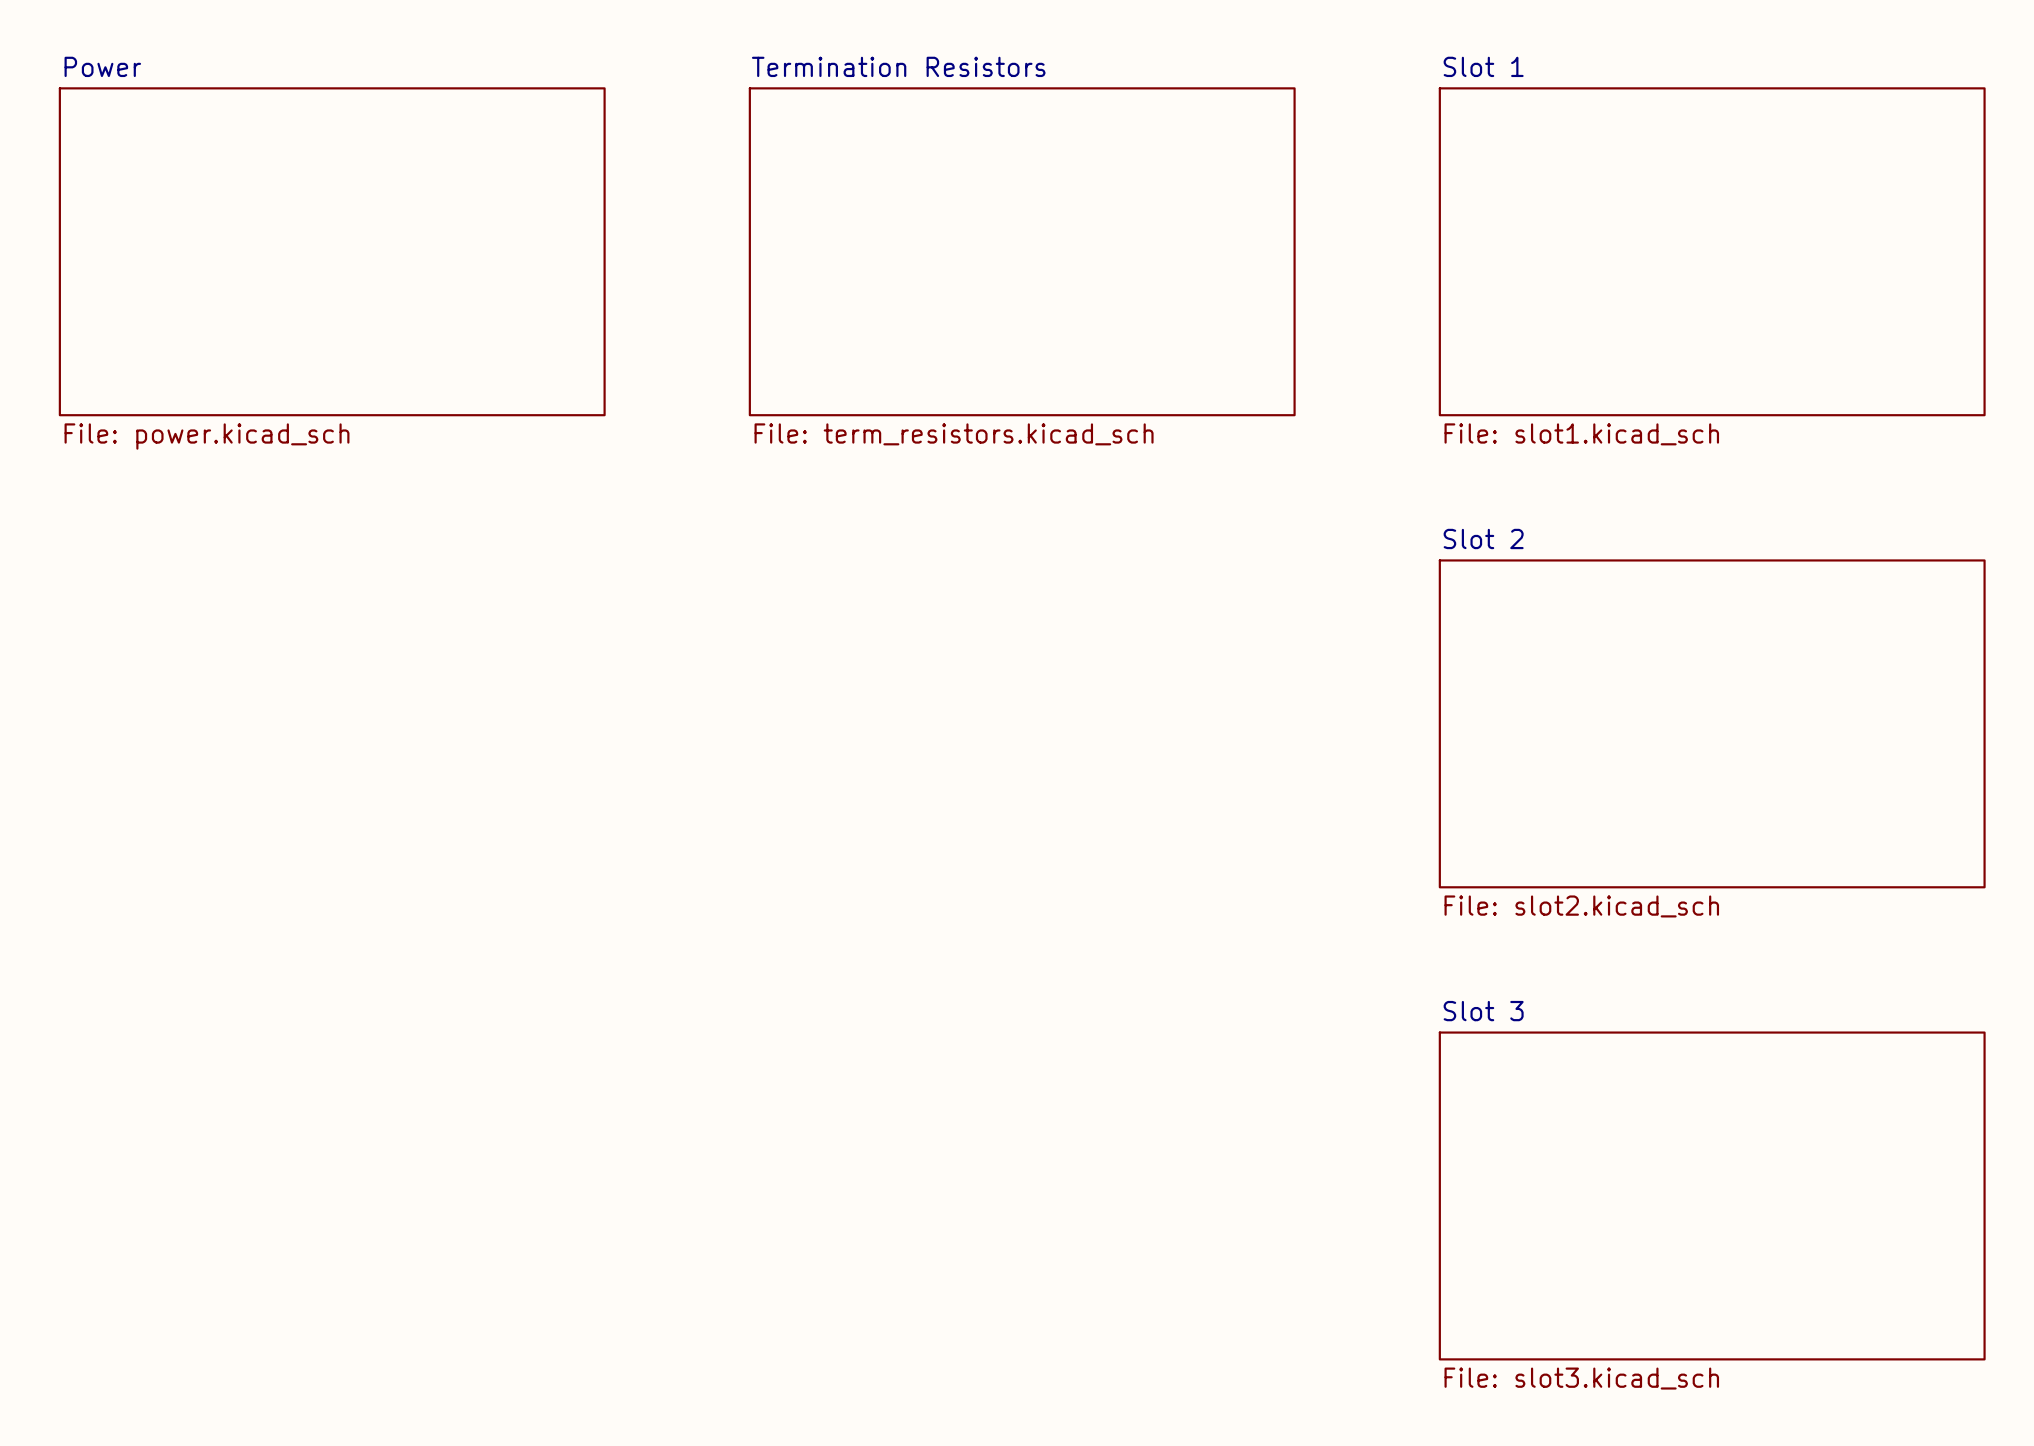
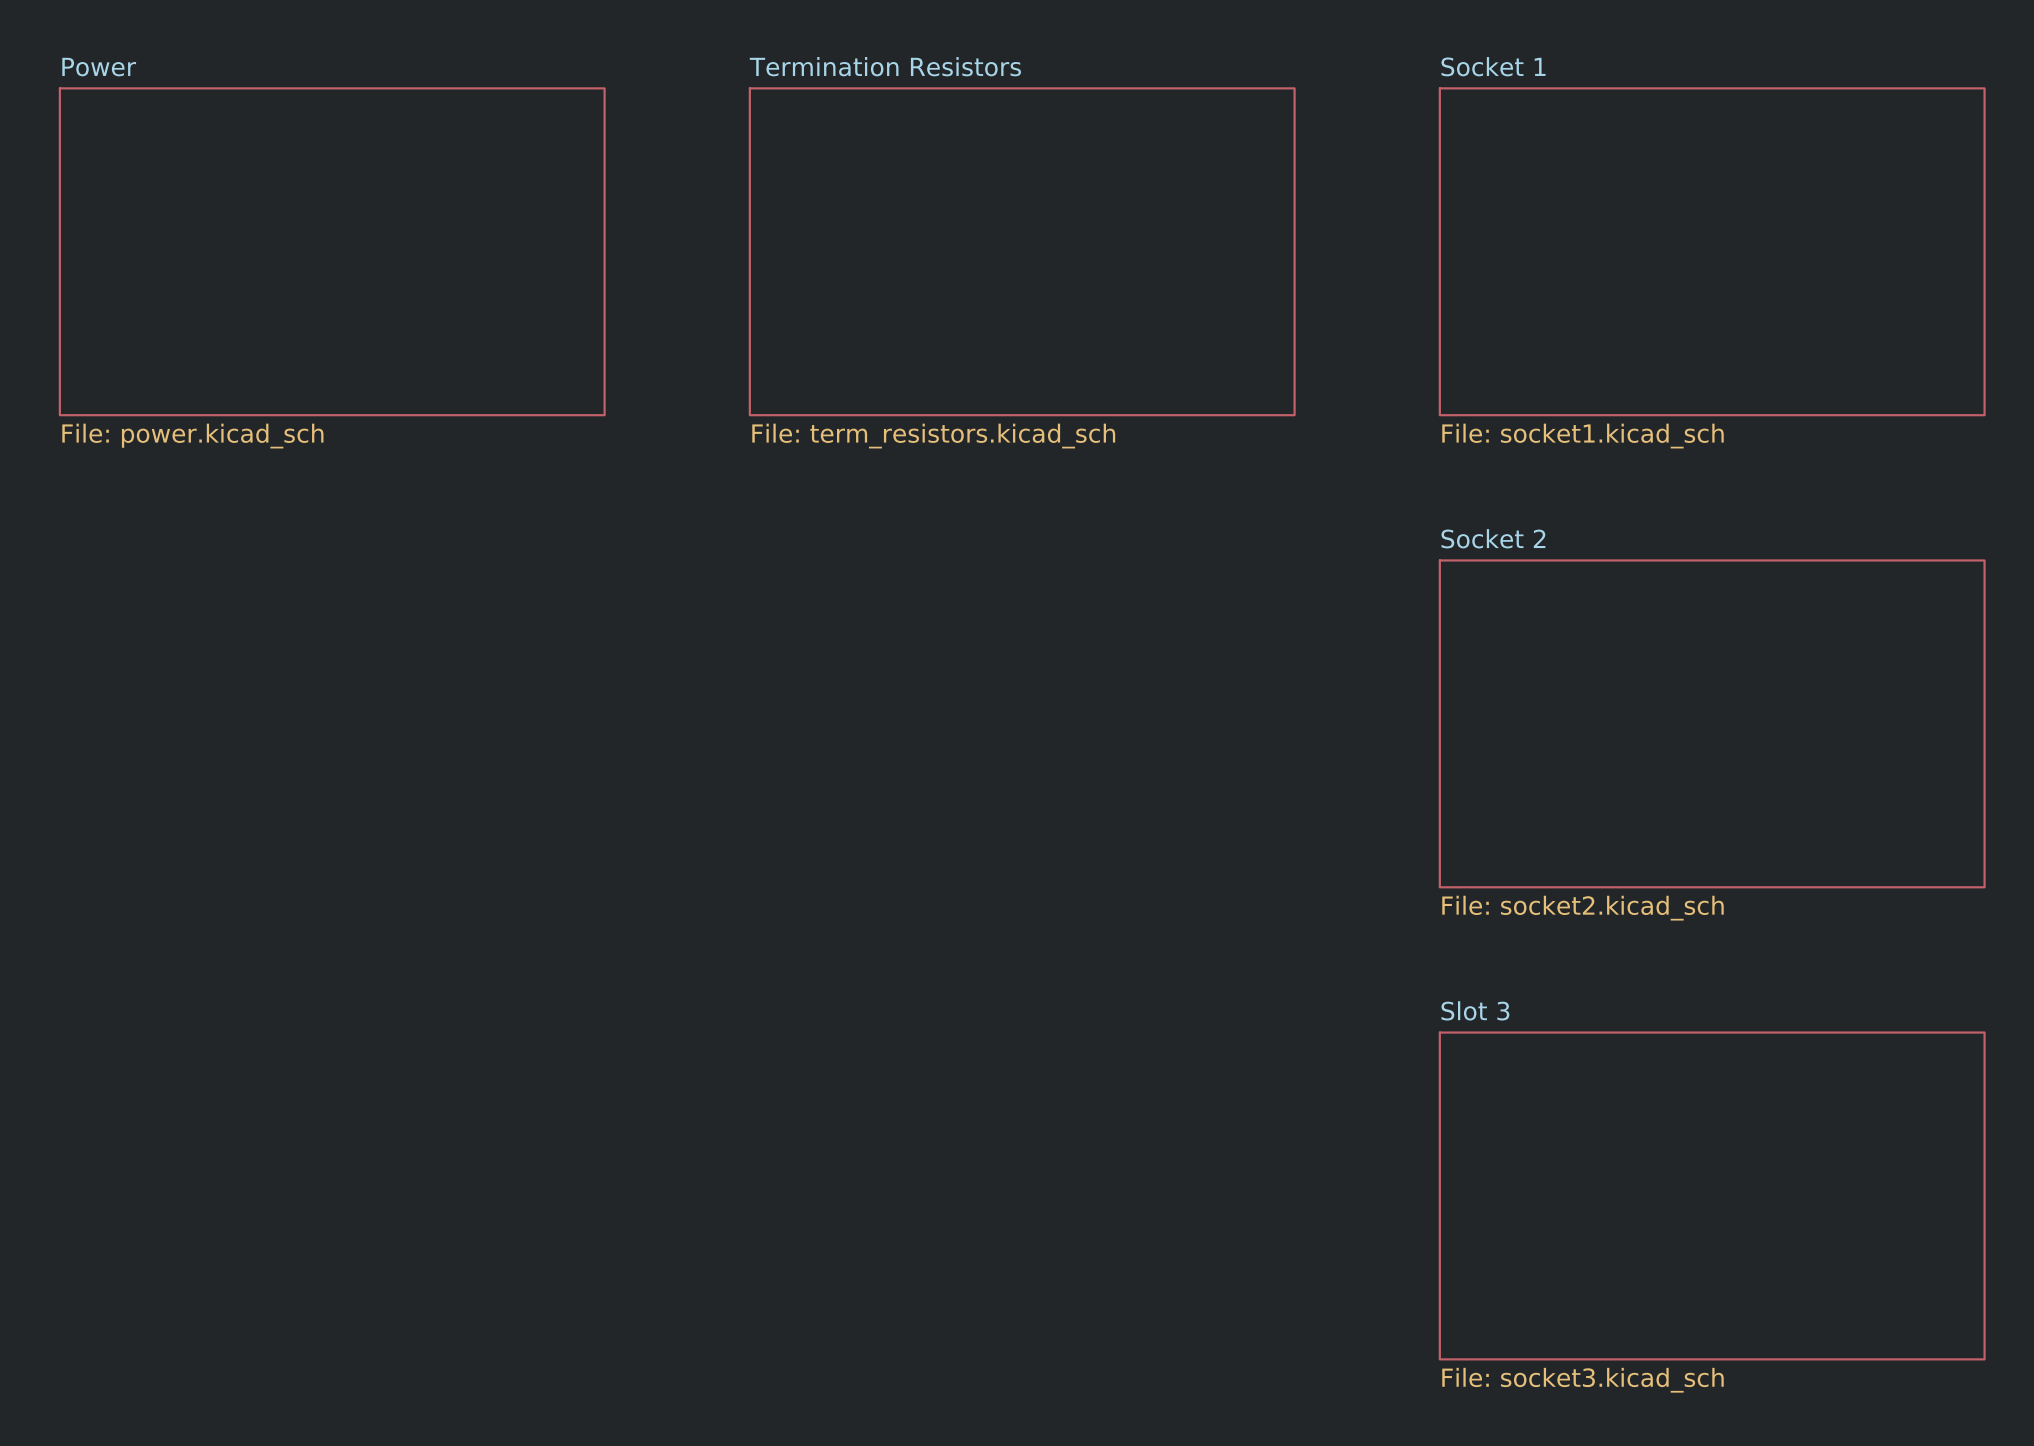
sheet Slot 1 name: Slot 1 (1483, 66) -> Socket 1 (1493, 66)
sheet Slot 1 value: File: slot1.kicad_sch (1581, 434) -> File: socket1.kicad_sch (1583, 436)
sheet Slot 2 name: Slot 2 (1483, 538) -> Socket 2 (1493, 538)
sheet Slot 2 value: File: slot2.kicad_sch (1581, 906) -> File: socket2.kicad_sch (1583, 908)
sheet Slot 3 value: File: slot3.kicad_sch (1581, 1378) -> File: socket3.kicad_sch (1583, 1380)

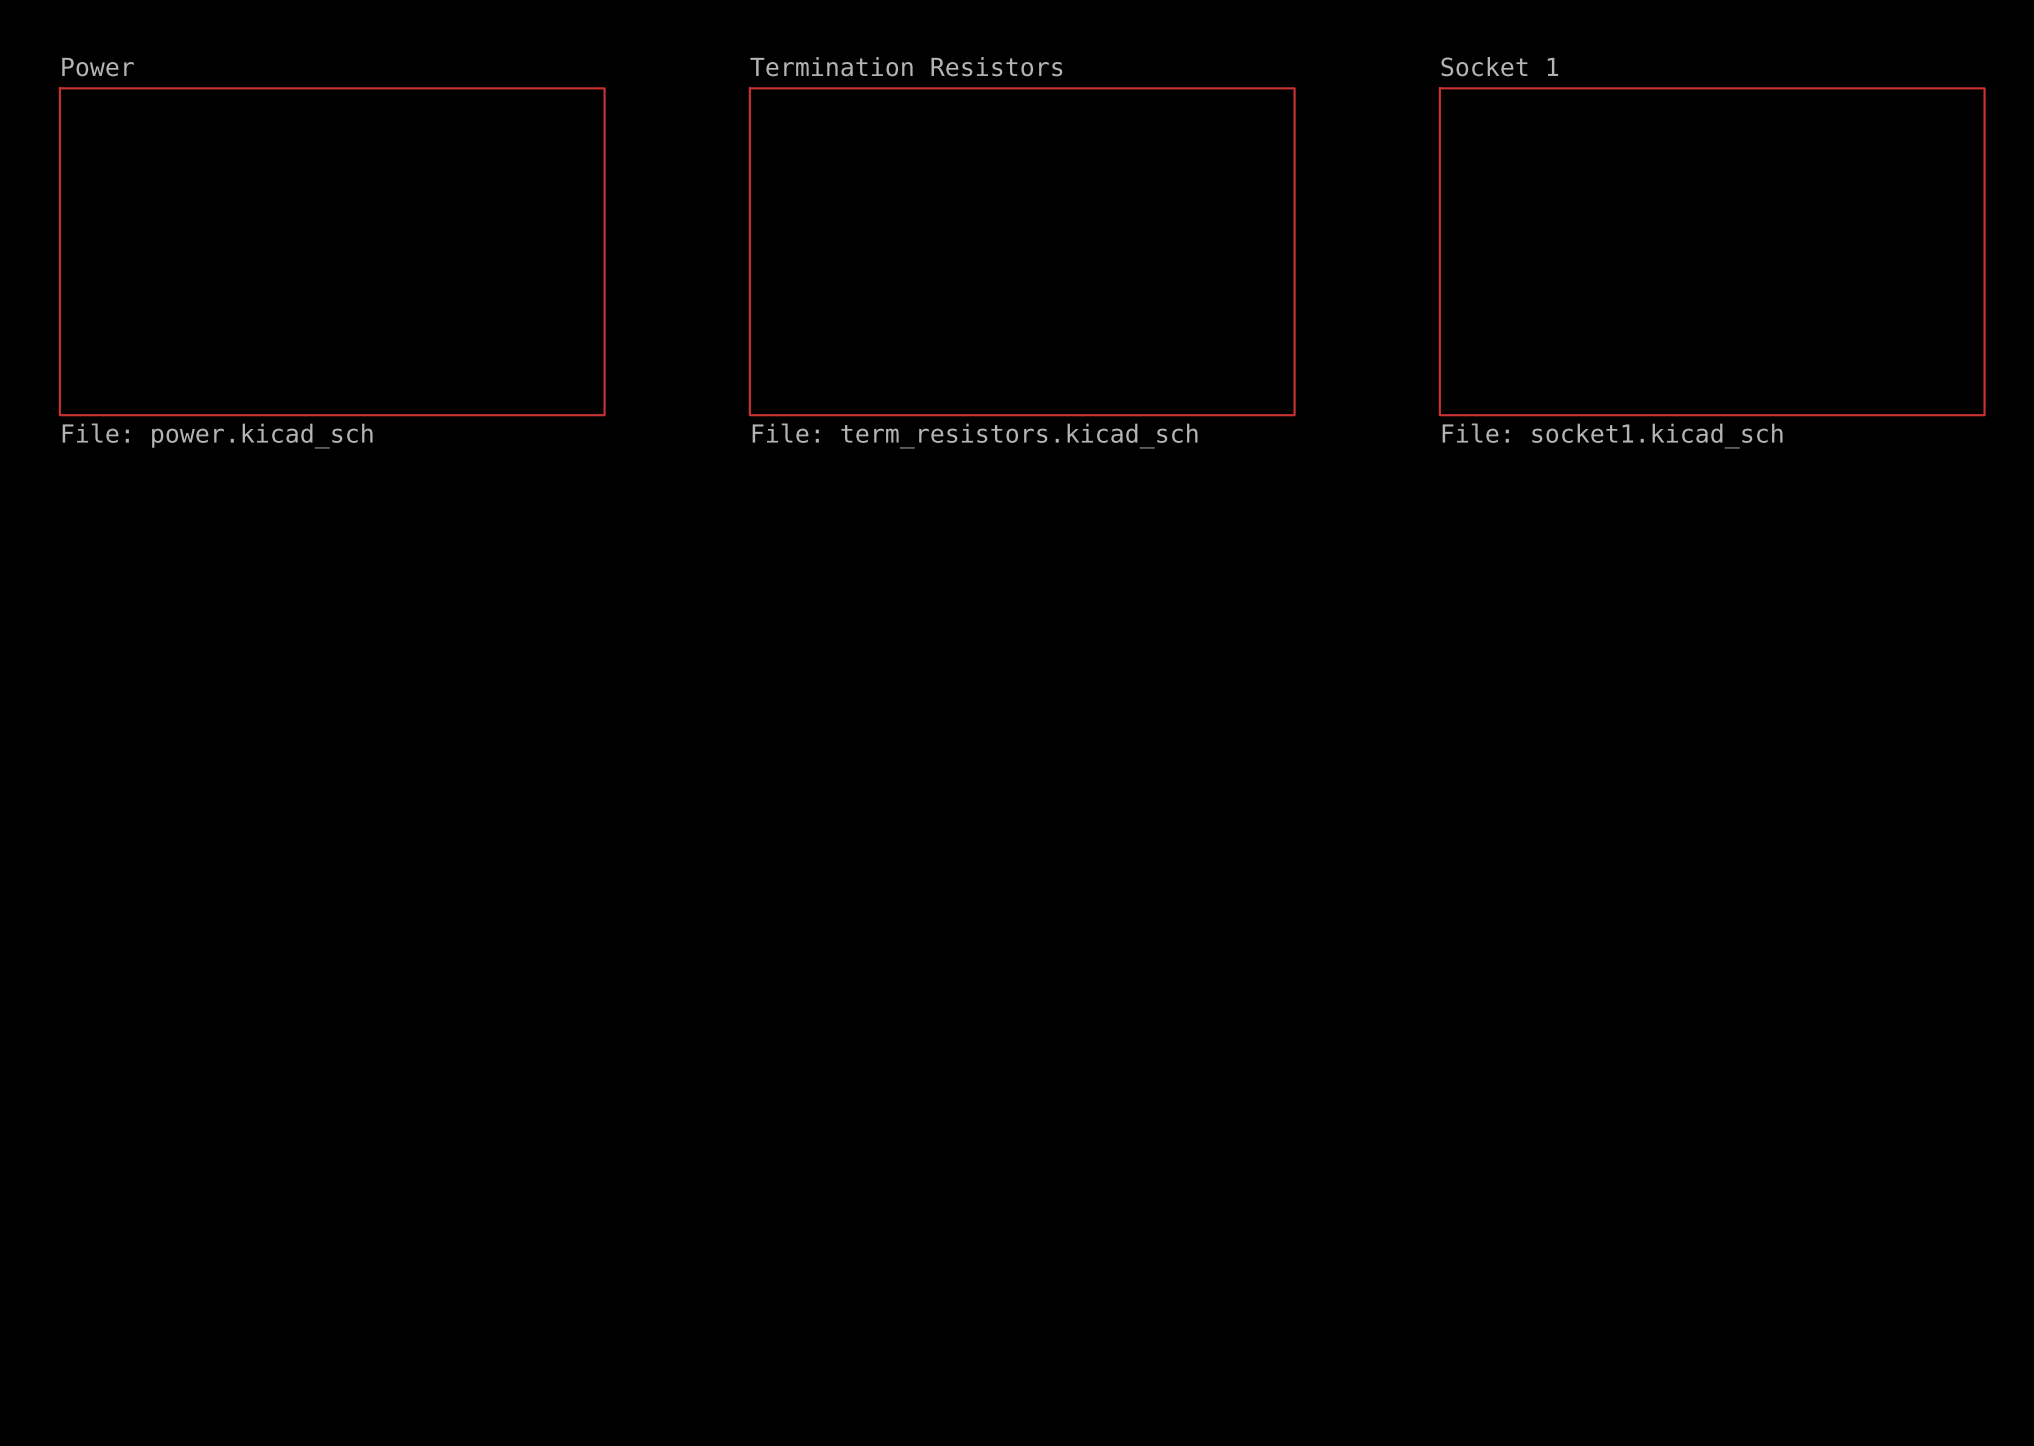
sheet Socket 2: File: socket2.kicad_sch (1712, 723) -> none
sheet Slot 3: File: socket3.kicad_sch (1712, 1195) -> none

